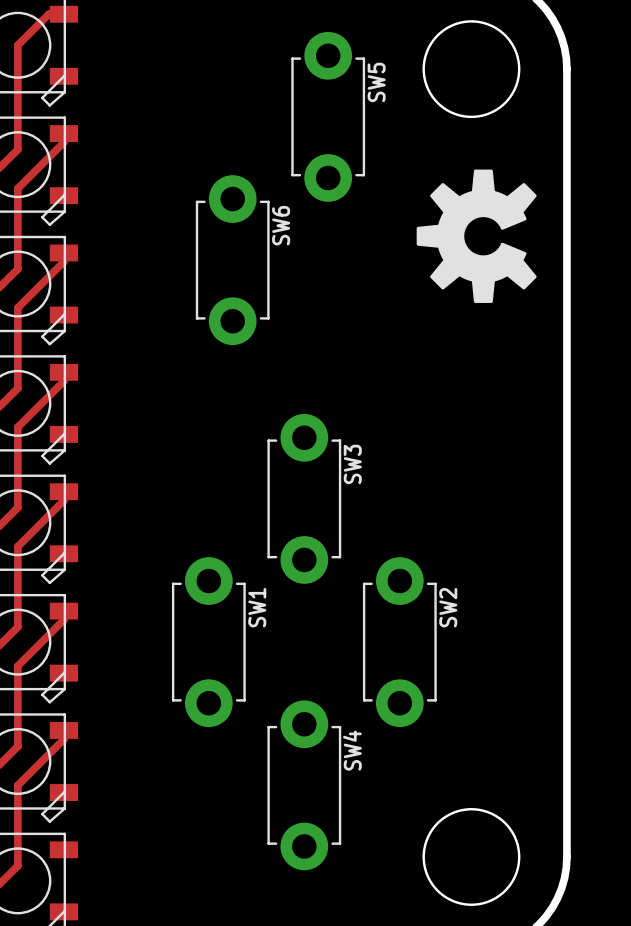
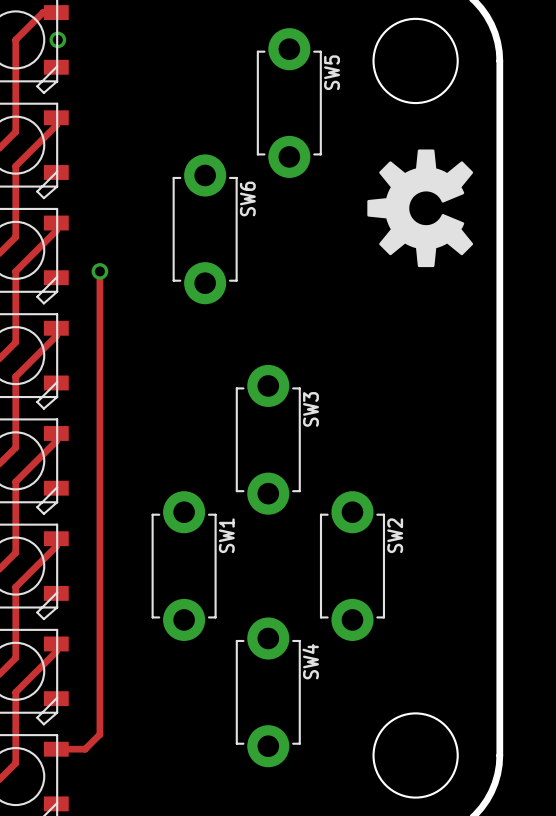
via: none -> (57, 39)
track: none -> (99, 271) (99, 734) (85, 749) (56, 749)
via: none -> (99, 271)

